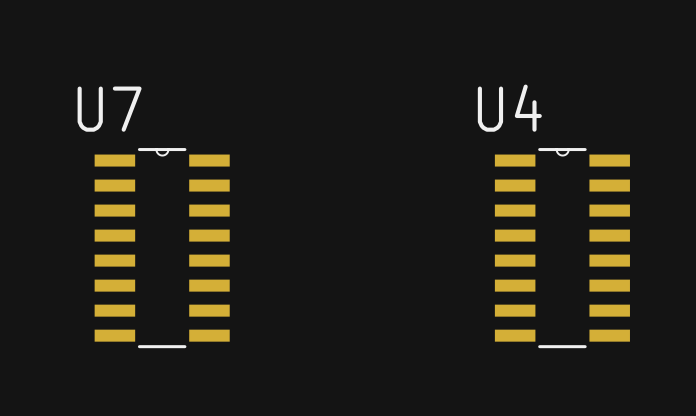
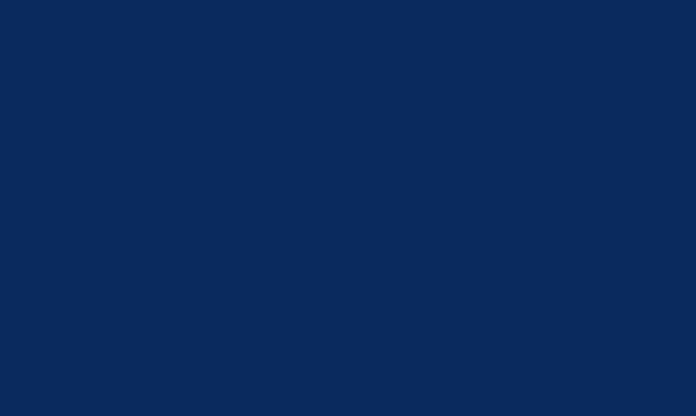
U7: (162, 248) -> none
U4: (562, 248) -> none

